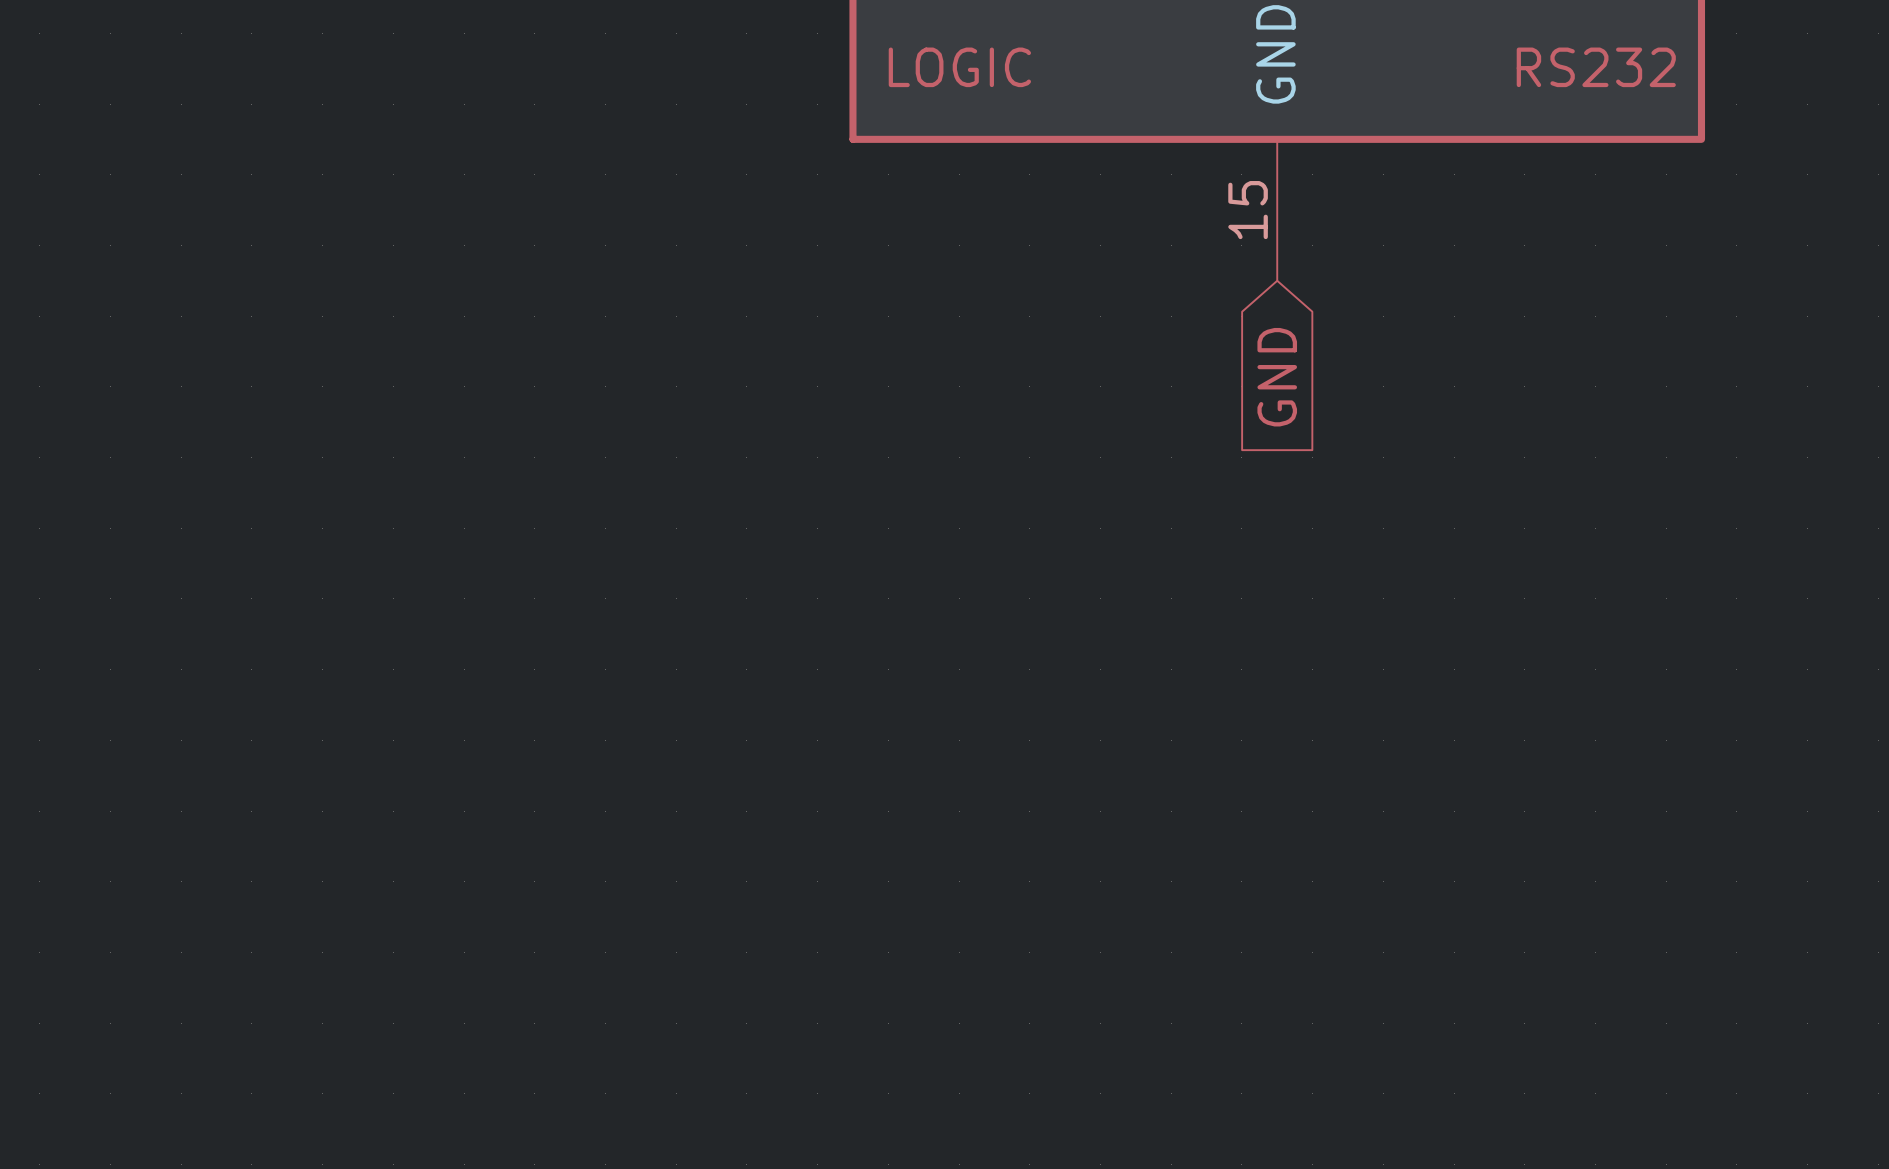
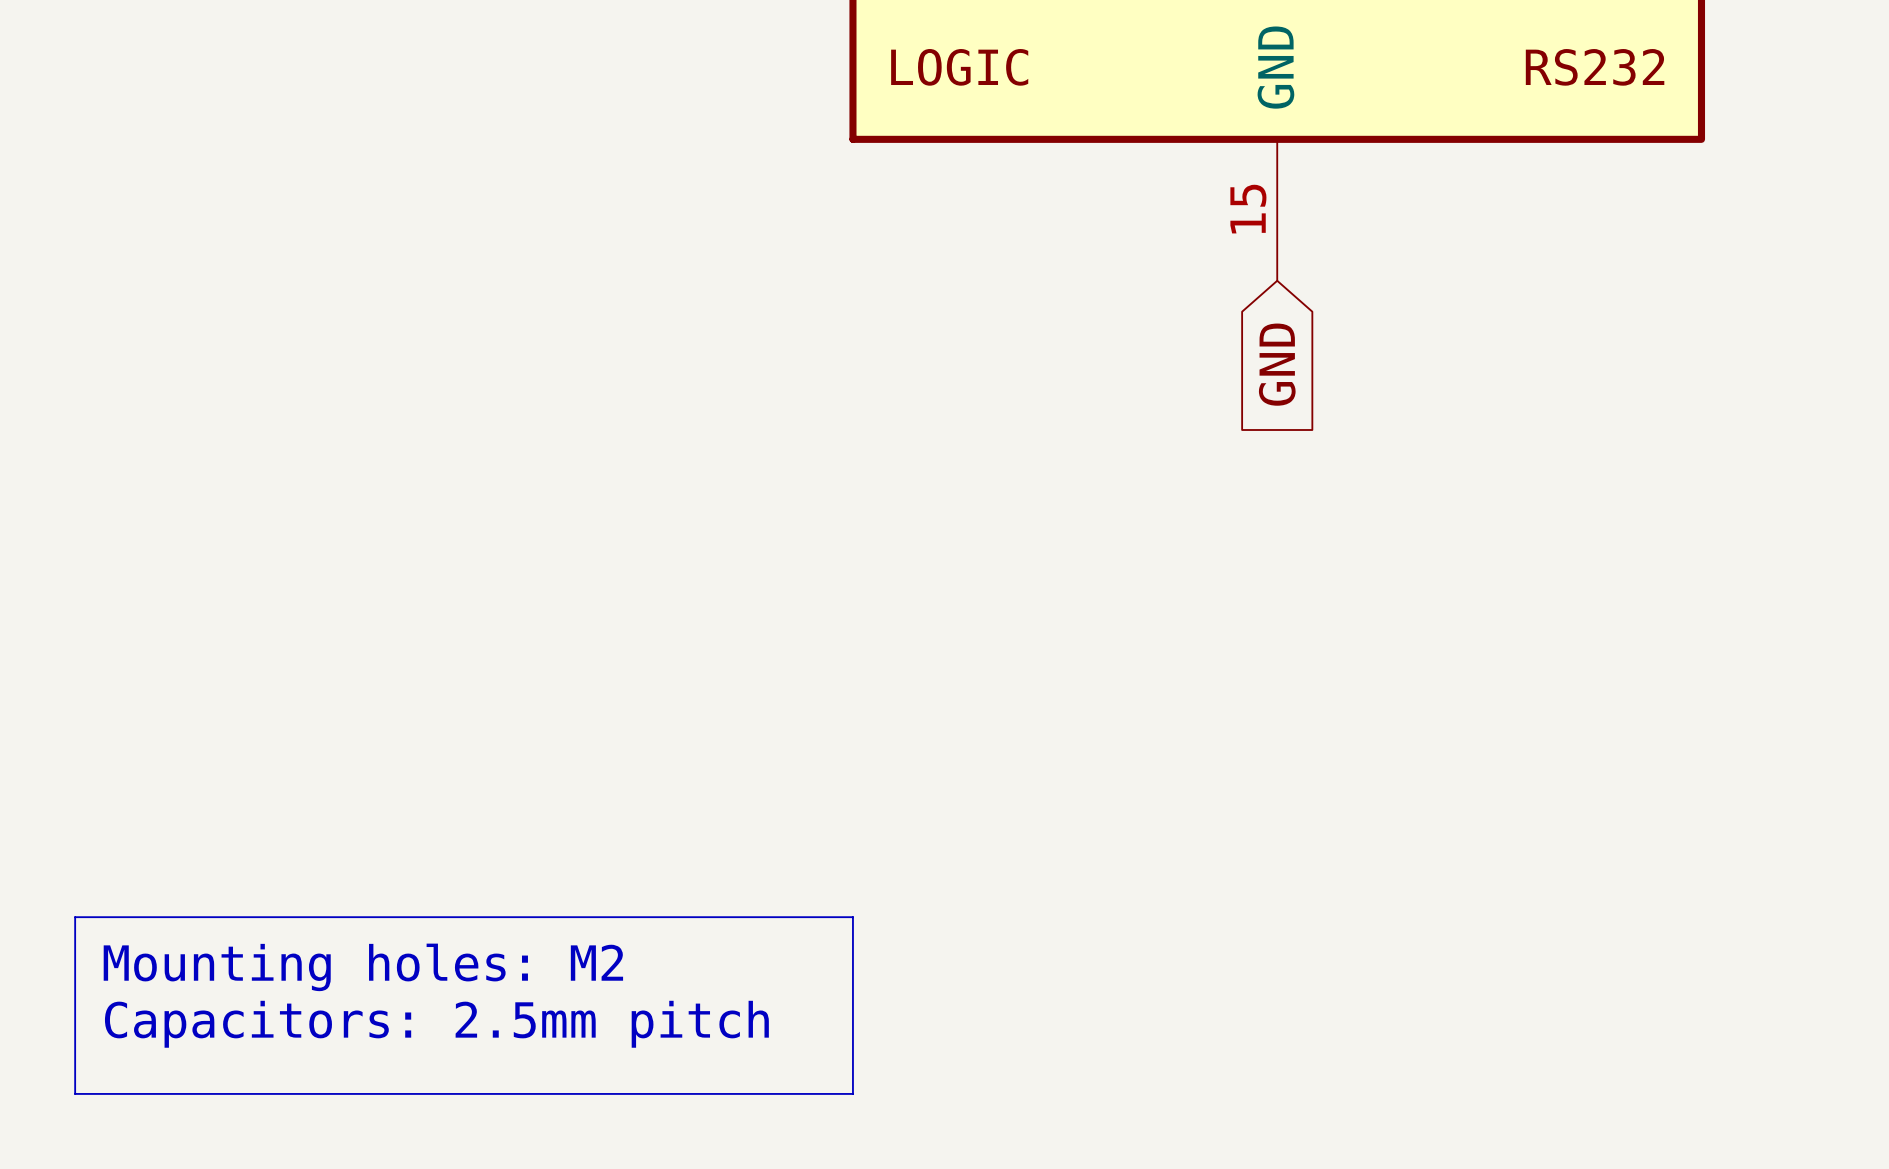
line: none -> (75, 917) (852, 917) (852, 1093) (75, 1093) (75, 917)
text: none -> Mounting holes: M2 (363, 967)
text: none -> Capacitors: 2.5mm pitch (436, 1024)

